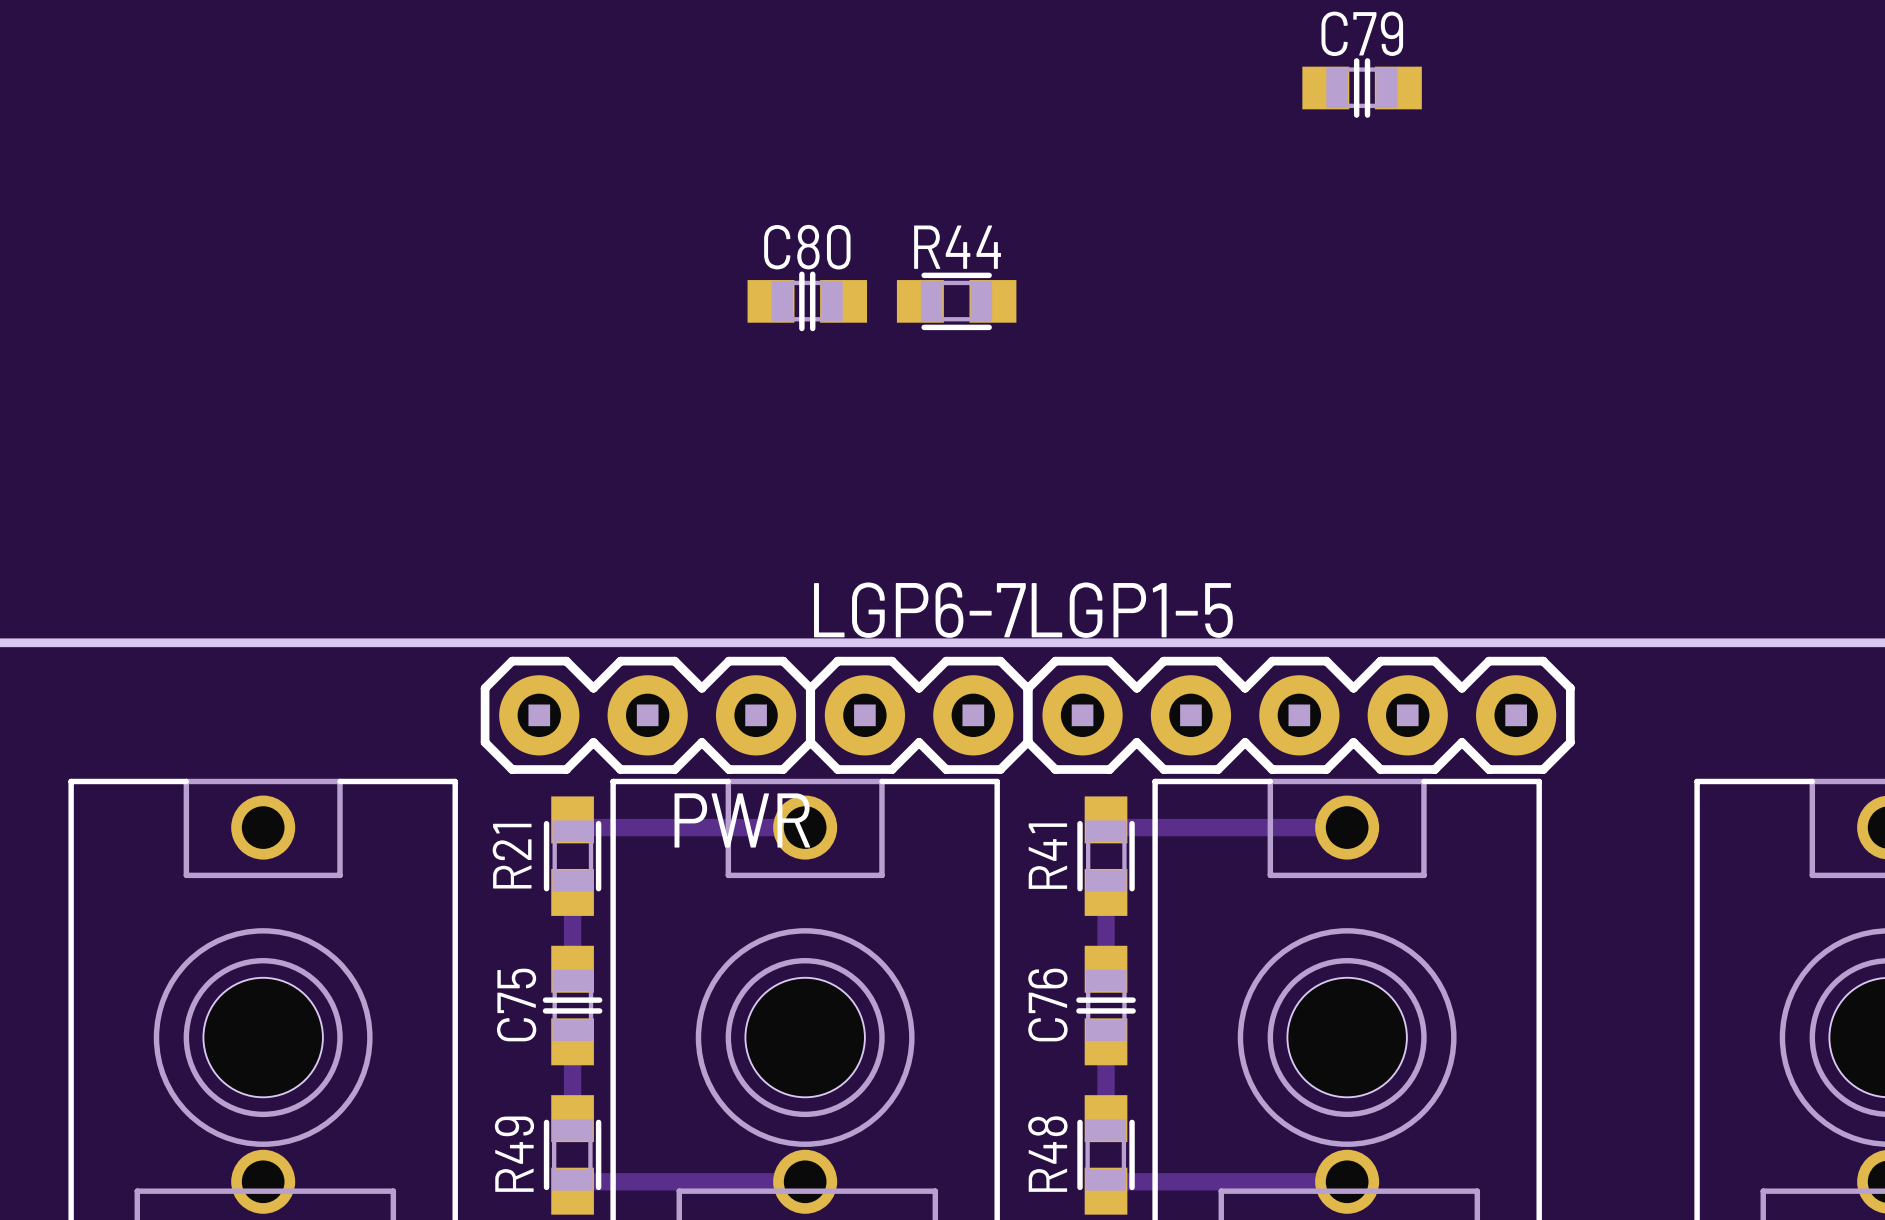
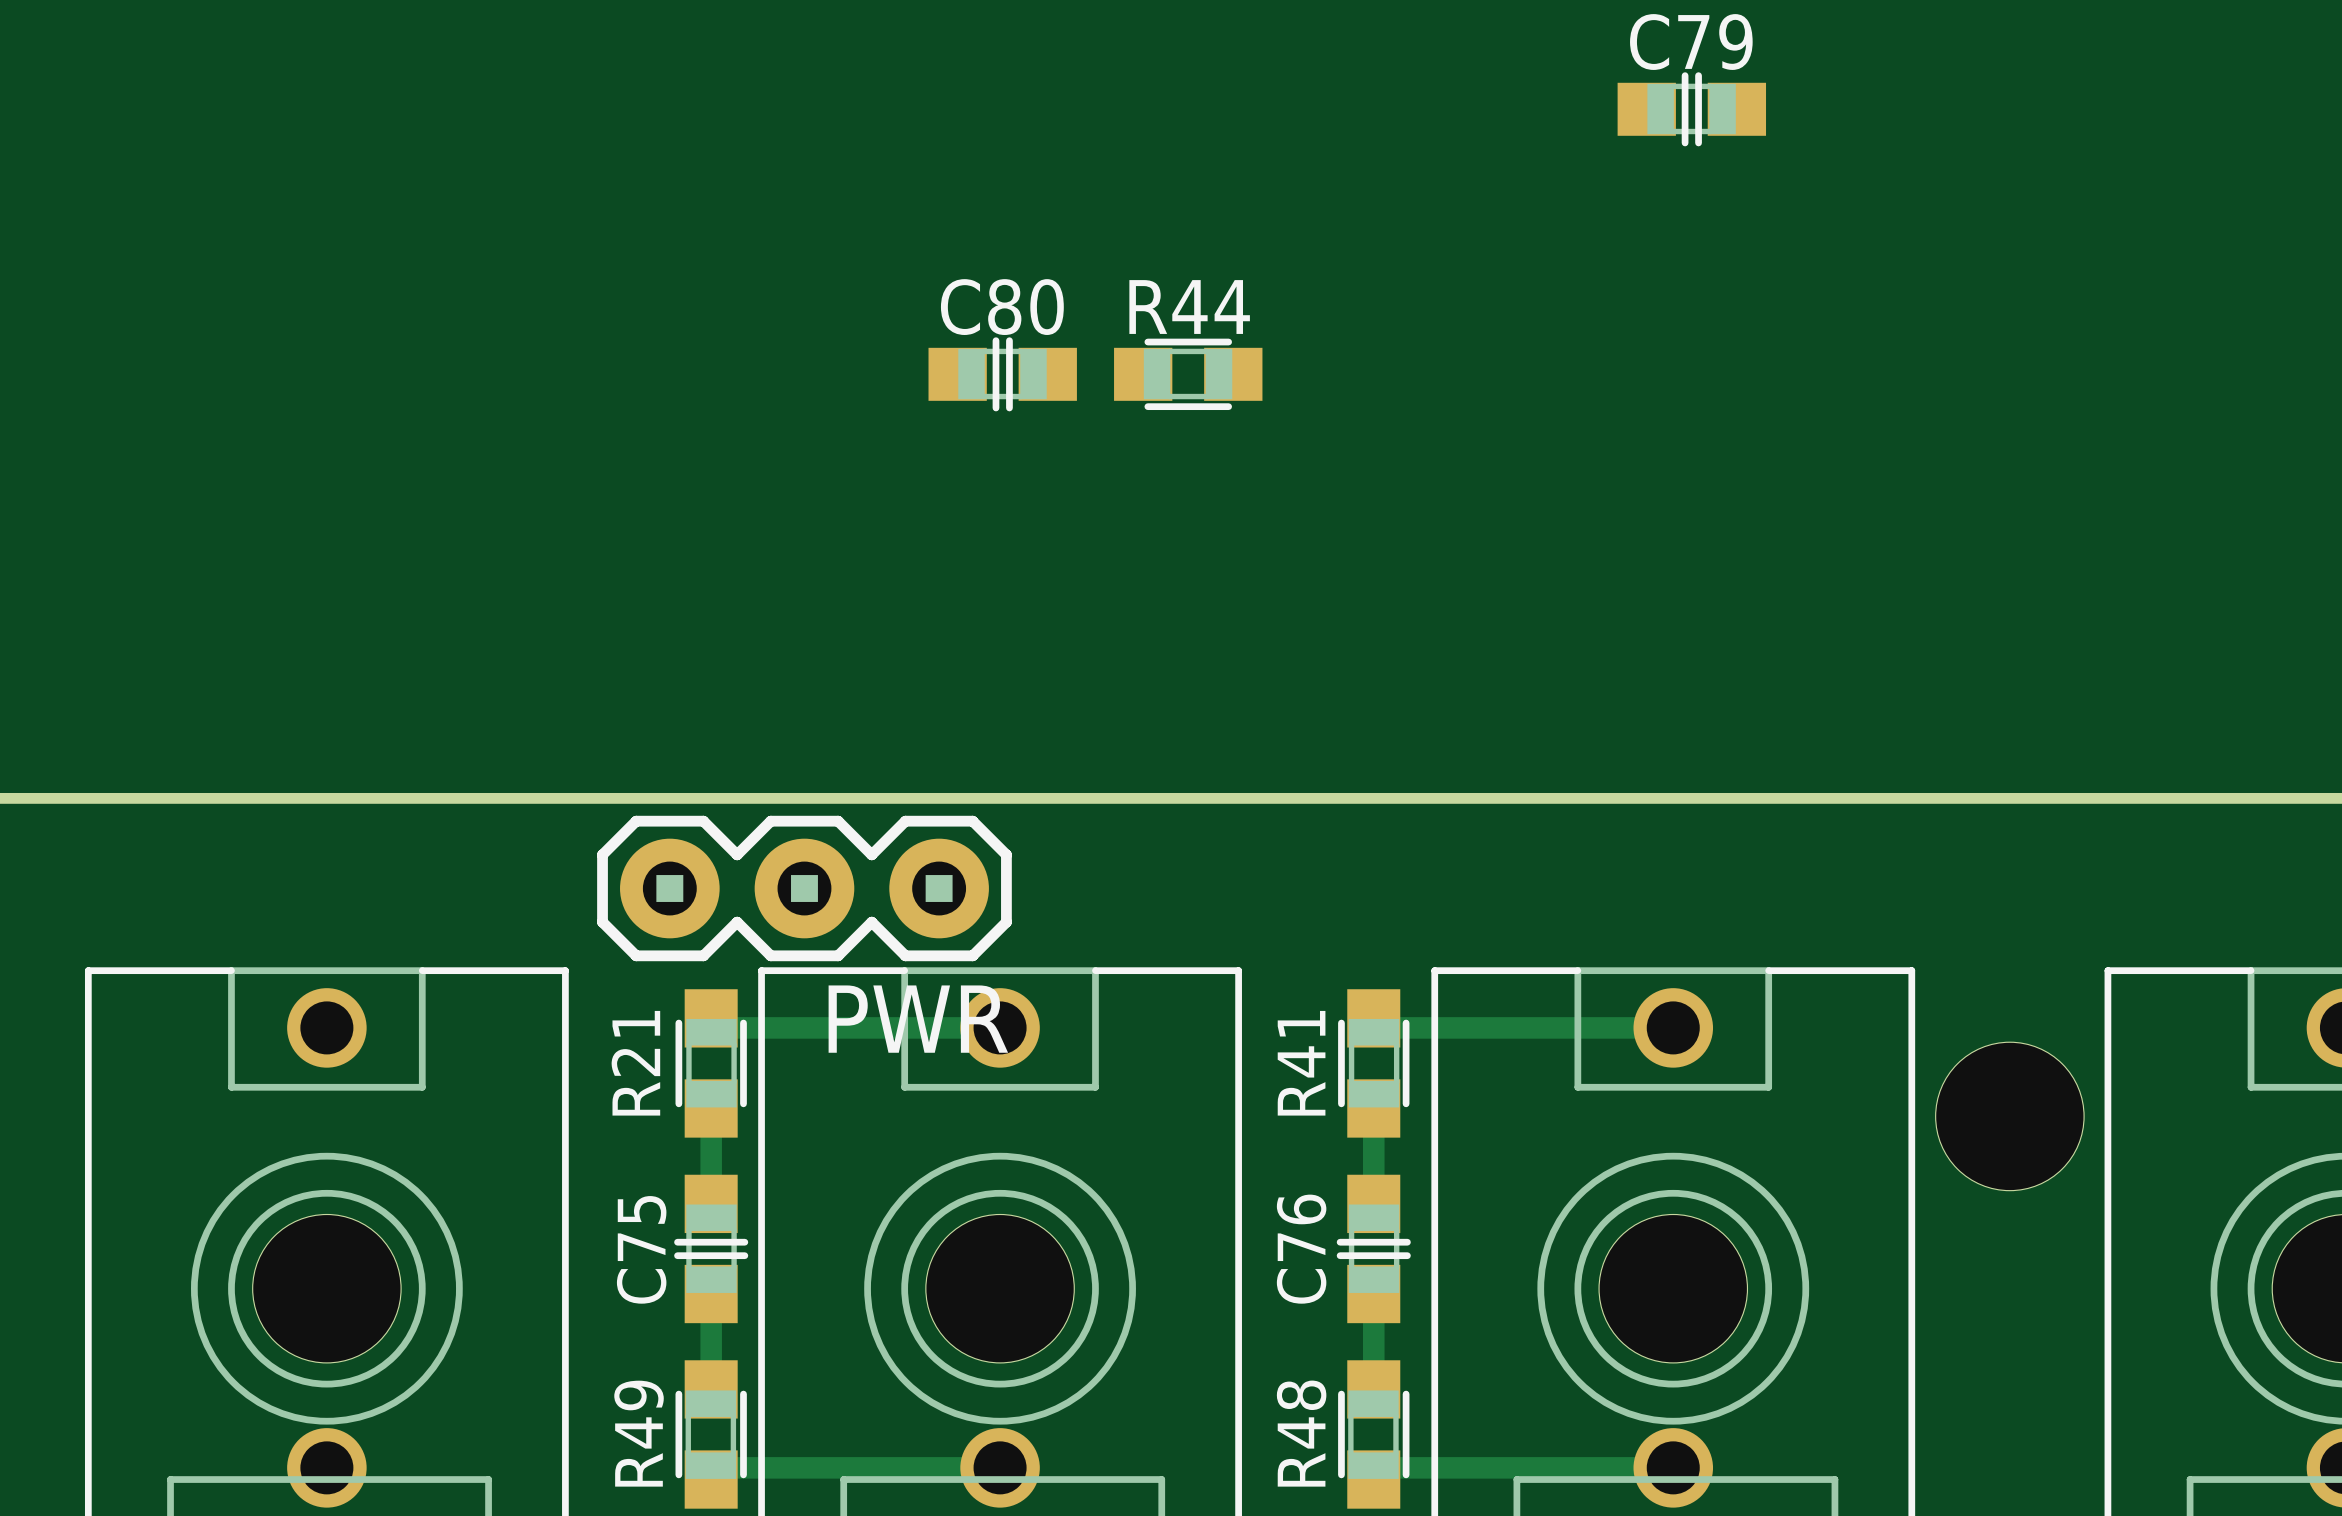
LGP6-7: (919, 715) -> none
LGP1-5: (1299, 715) -> none
hole: none -> (2009, 1116)

